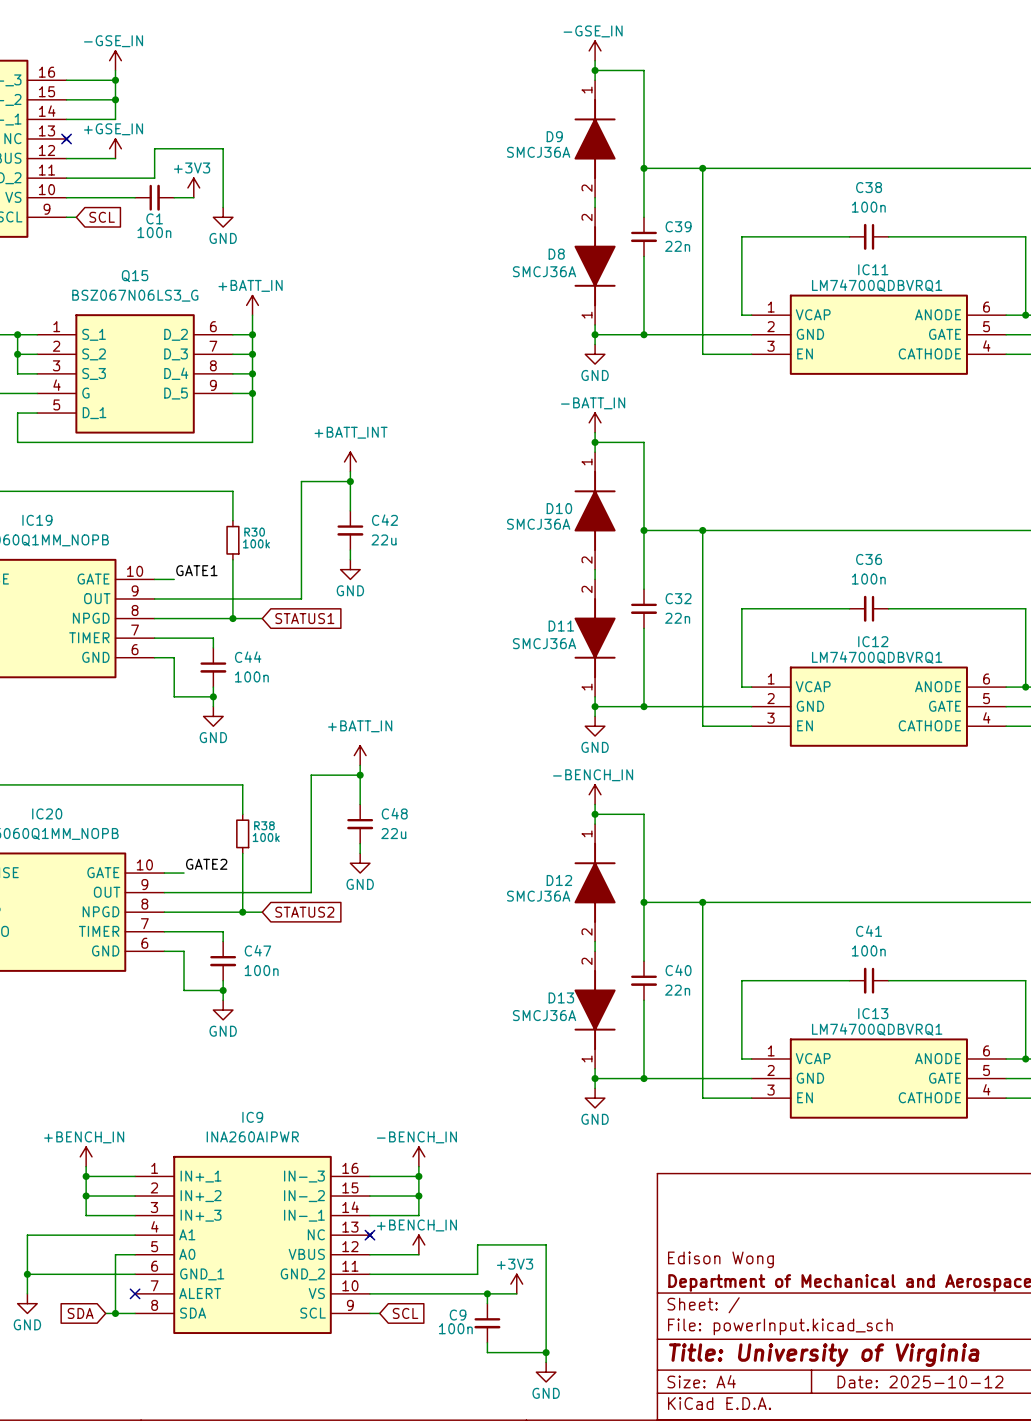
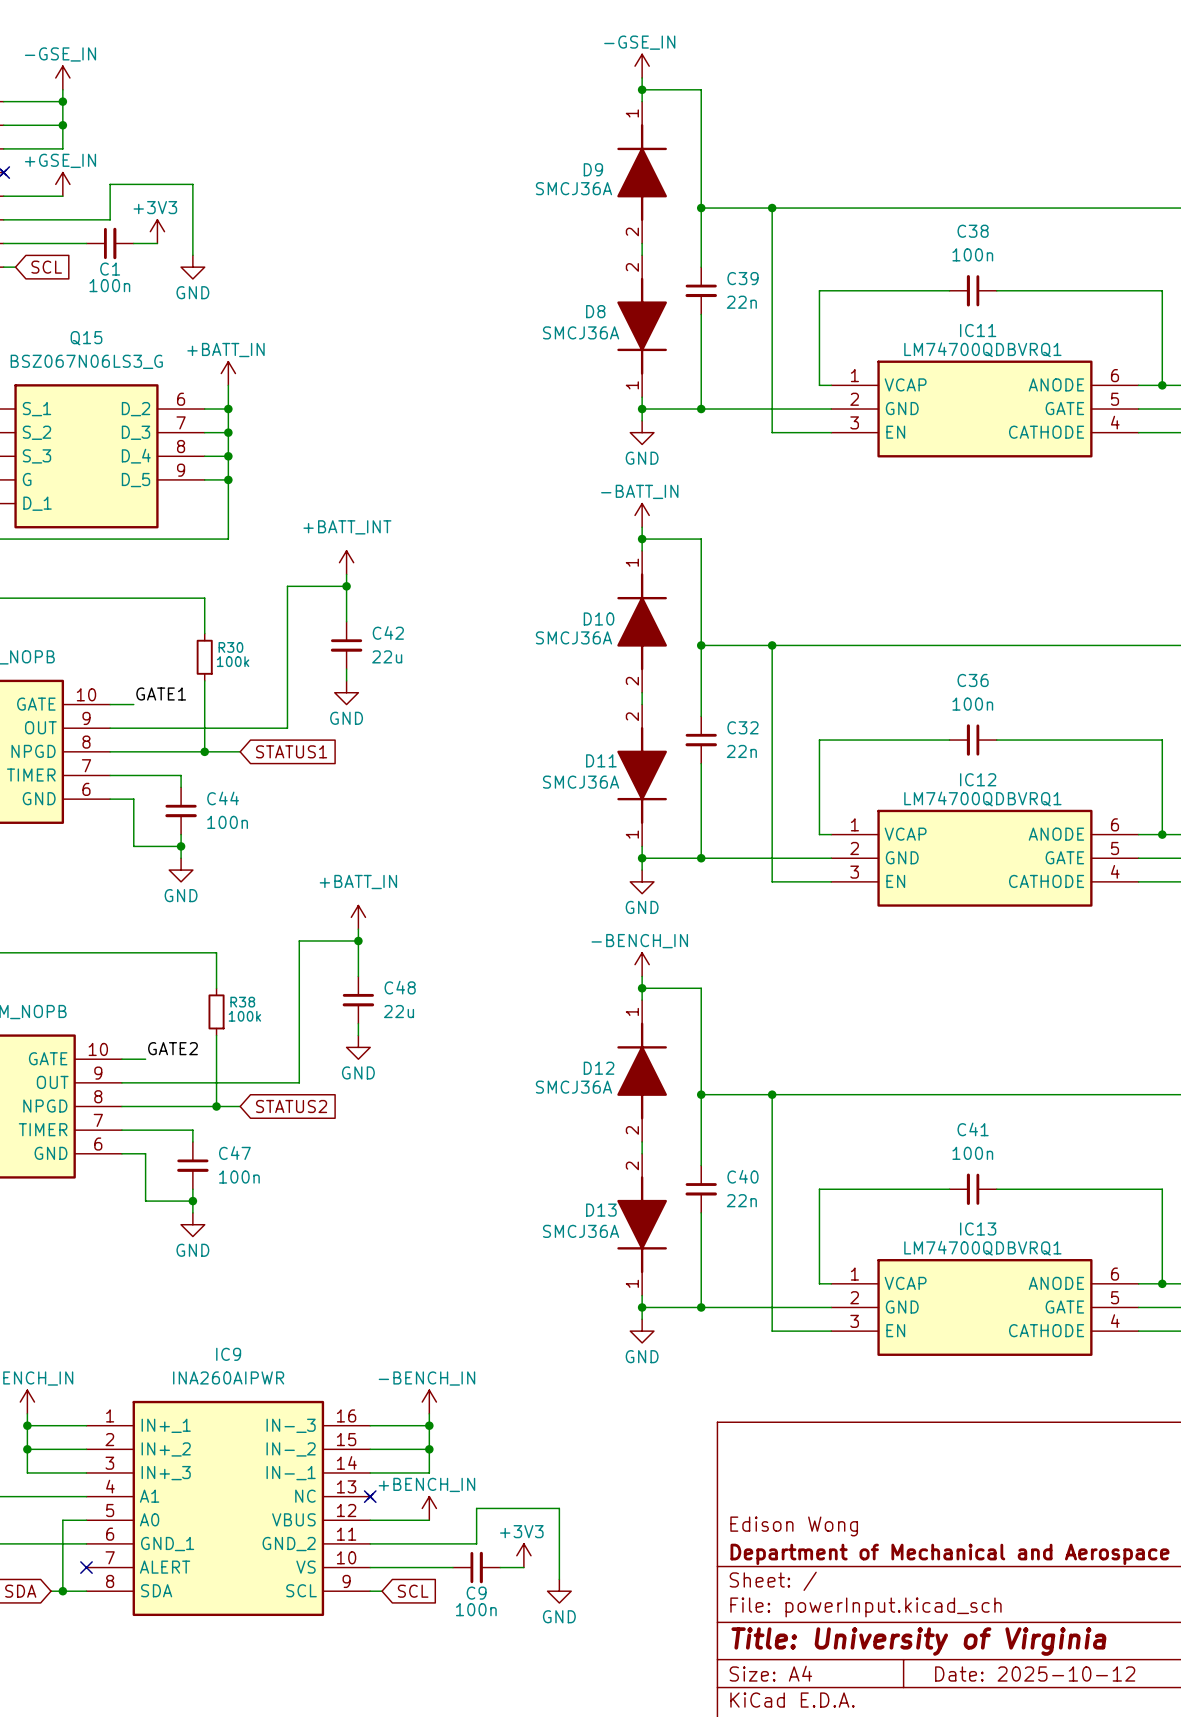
wire: (477, 1244) (477, 1274) (458, 1274) -> (500, 1508) (476, 1508) (476, 1543)
wire: (526, 1244) (546, 1244) (546, 1362) -> (559, 1508) (559, 1579)
power symbol position: +3V3 (516, 1284) -> +3V3 (523, 1555)
wire: (487, 1293) (487, 1303) -> none
junction: (487, 1293) -> none
wire: (497, 1293) (516, 1293) -> none
C9 rotation: 0° (487, 1323) -> 90° counterclockwise (476, 1567)
C9 position: (487, 1323) -> (476, 1567)
wire: (487, 1342) (487, 1352) (546, 1352) -> none
junction: (546, 1352) -> none
power symbol position: GND (546, 1372) -> GND (559, 1591)

